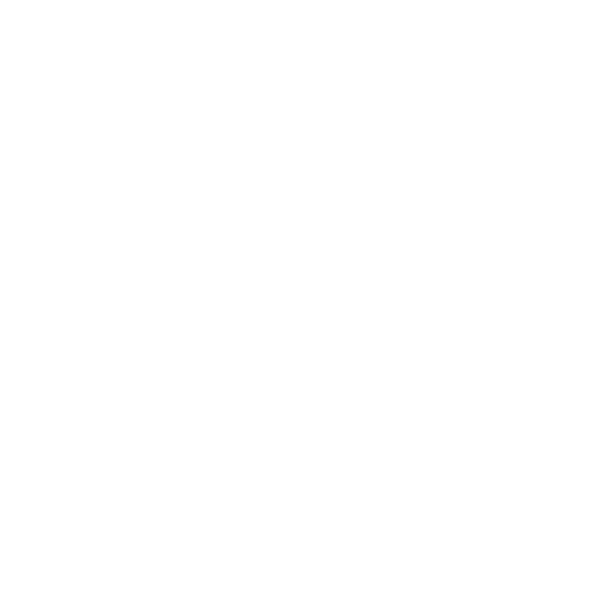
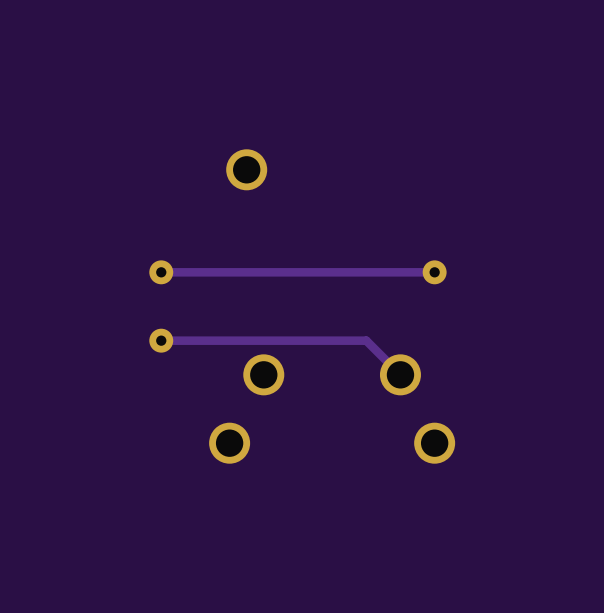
via: none -> (246, 169)
via: none -> (161, 272)
track: none -> (434, 272) (161, 272)
via: none -> (434, 272)
track: none -> (161, 340) (366, 340) (400, 374)
via: none -> (161, 340)
via: none -> (263, 374)
via: none -> (400, 374)
via: none -> (229, 443)
via: none -> (434, 443)

